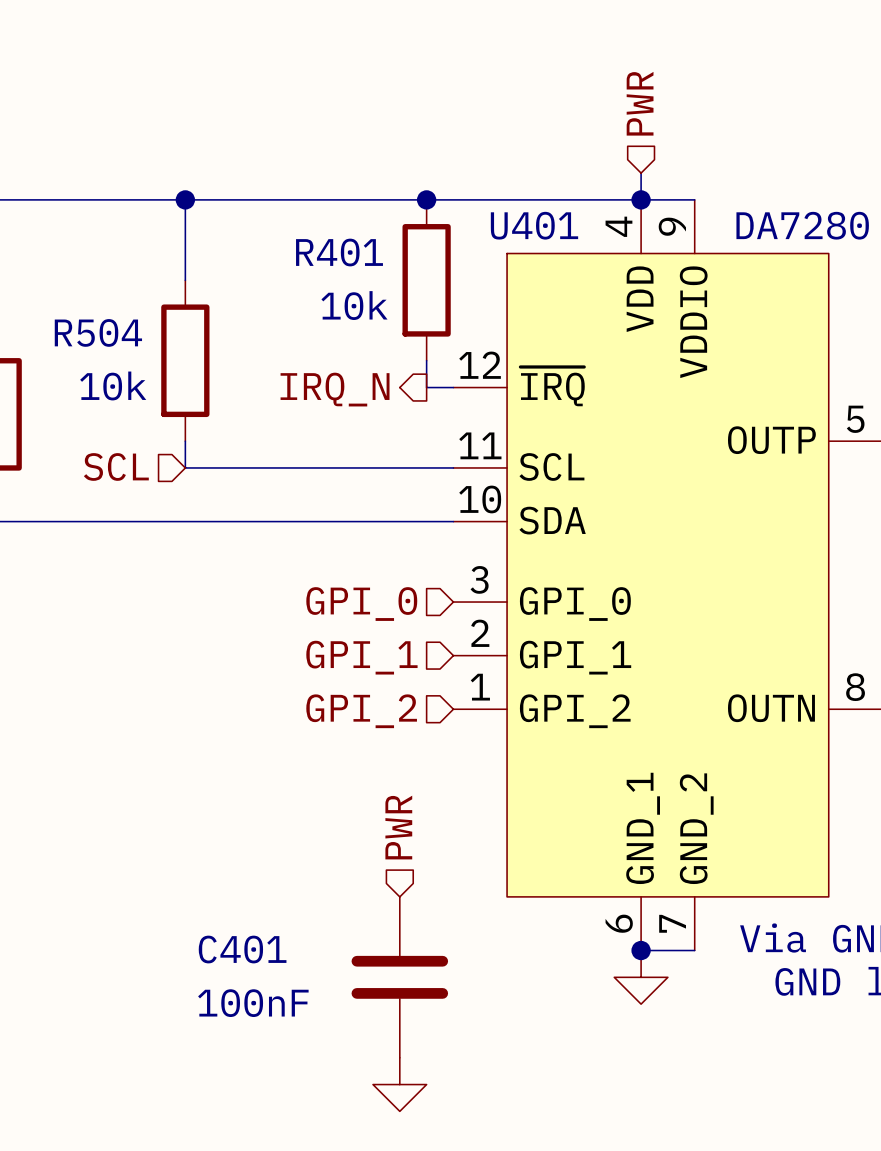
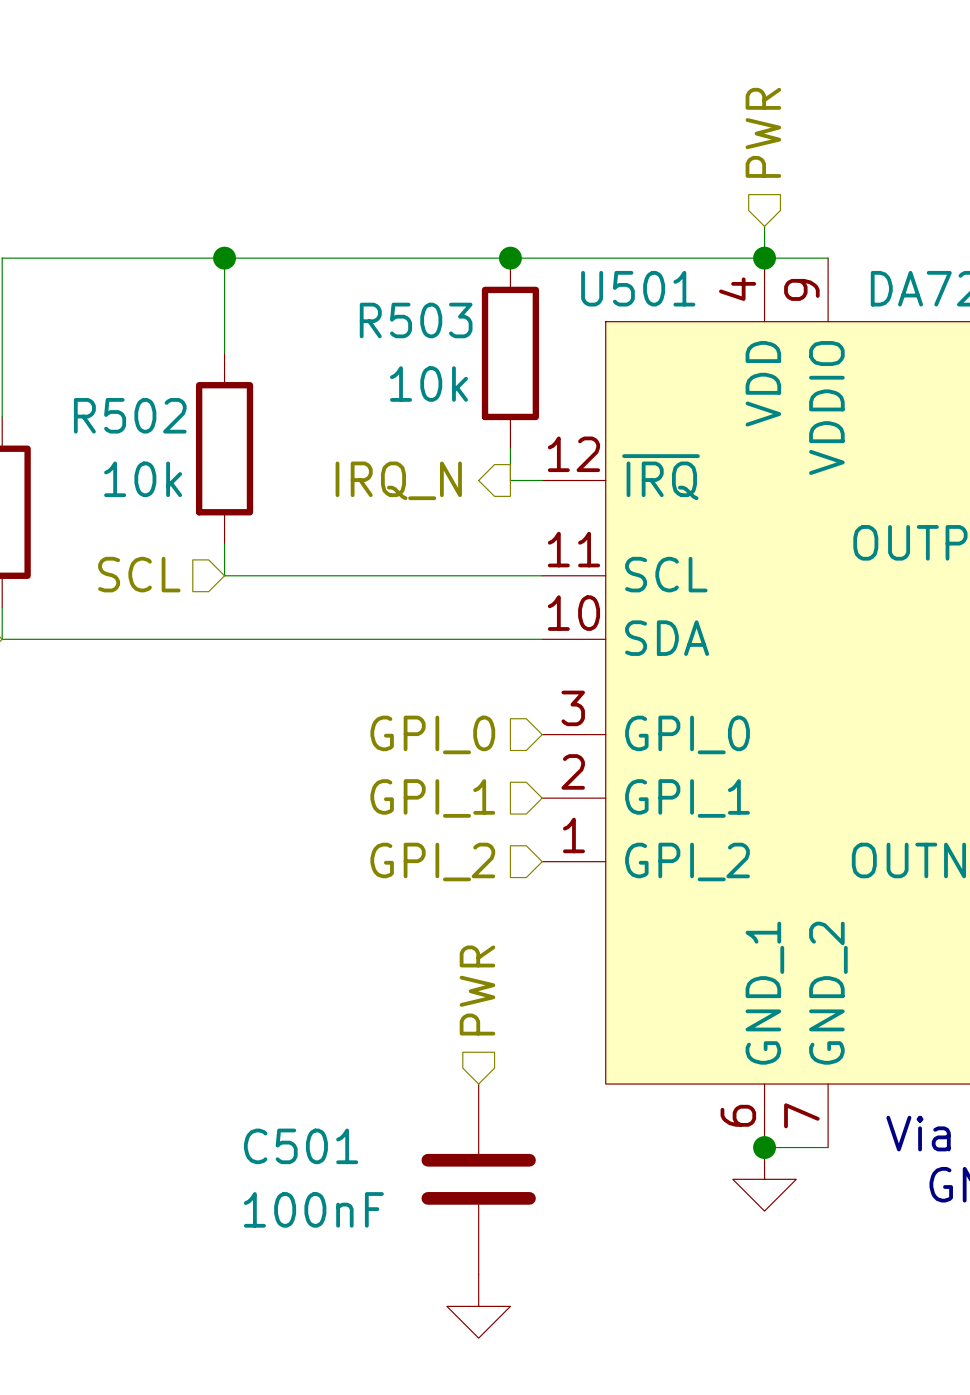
U401 name: U401 (534, 225) -> U501 (638, 288)
R401 name: R401 (339, 252) -> R503 (416, 320)
R504 name: R504 (98, 332) -> R502 (130, 415)
C401 name: C401 (242, 949) -> C501 (301, 1146)

